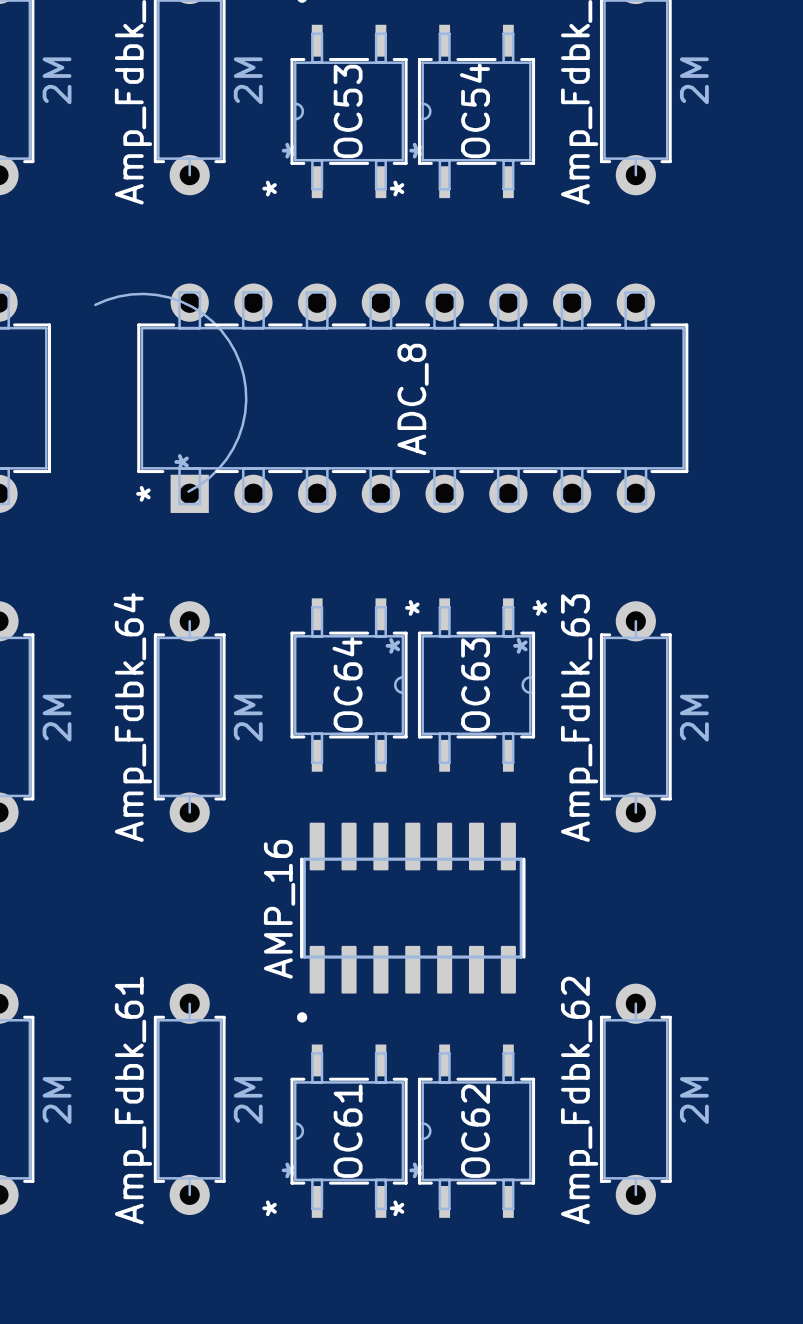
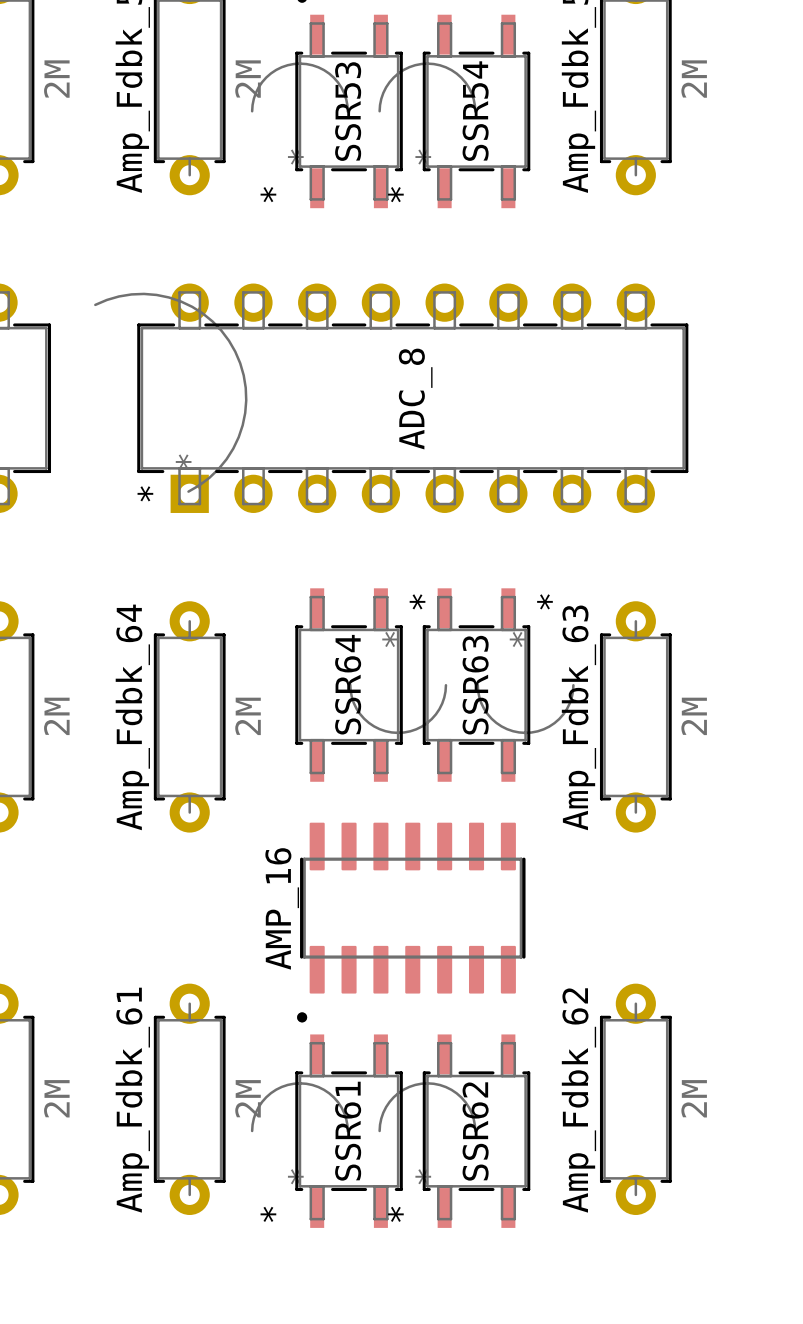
SSR53: none -> (326, 111)
OC53: (349, 111) -> none
SSR54: none -> (454, 111)
OC54: (476, 111) -> none
OC64: (349, 685) -> none
SSR64: none -> (371, 685)
OC63: (476, 685) -> none
SSR63: none -> (498, 685)
SSR61: none -> (326, 1131)
OC61: (349, 1131) -> none
SSR62: none -> (454, 1131)
OC62: (476, 1131) -> none

